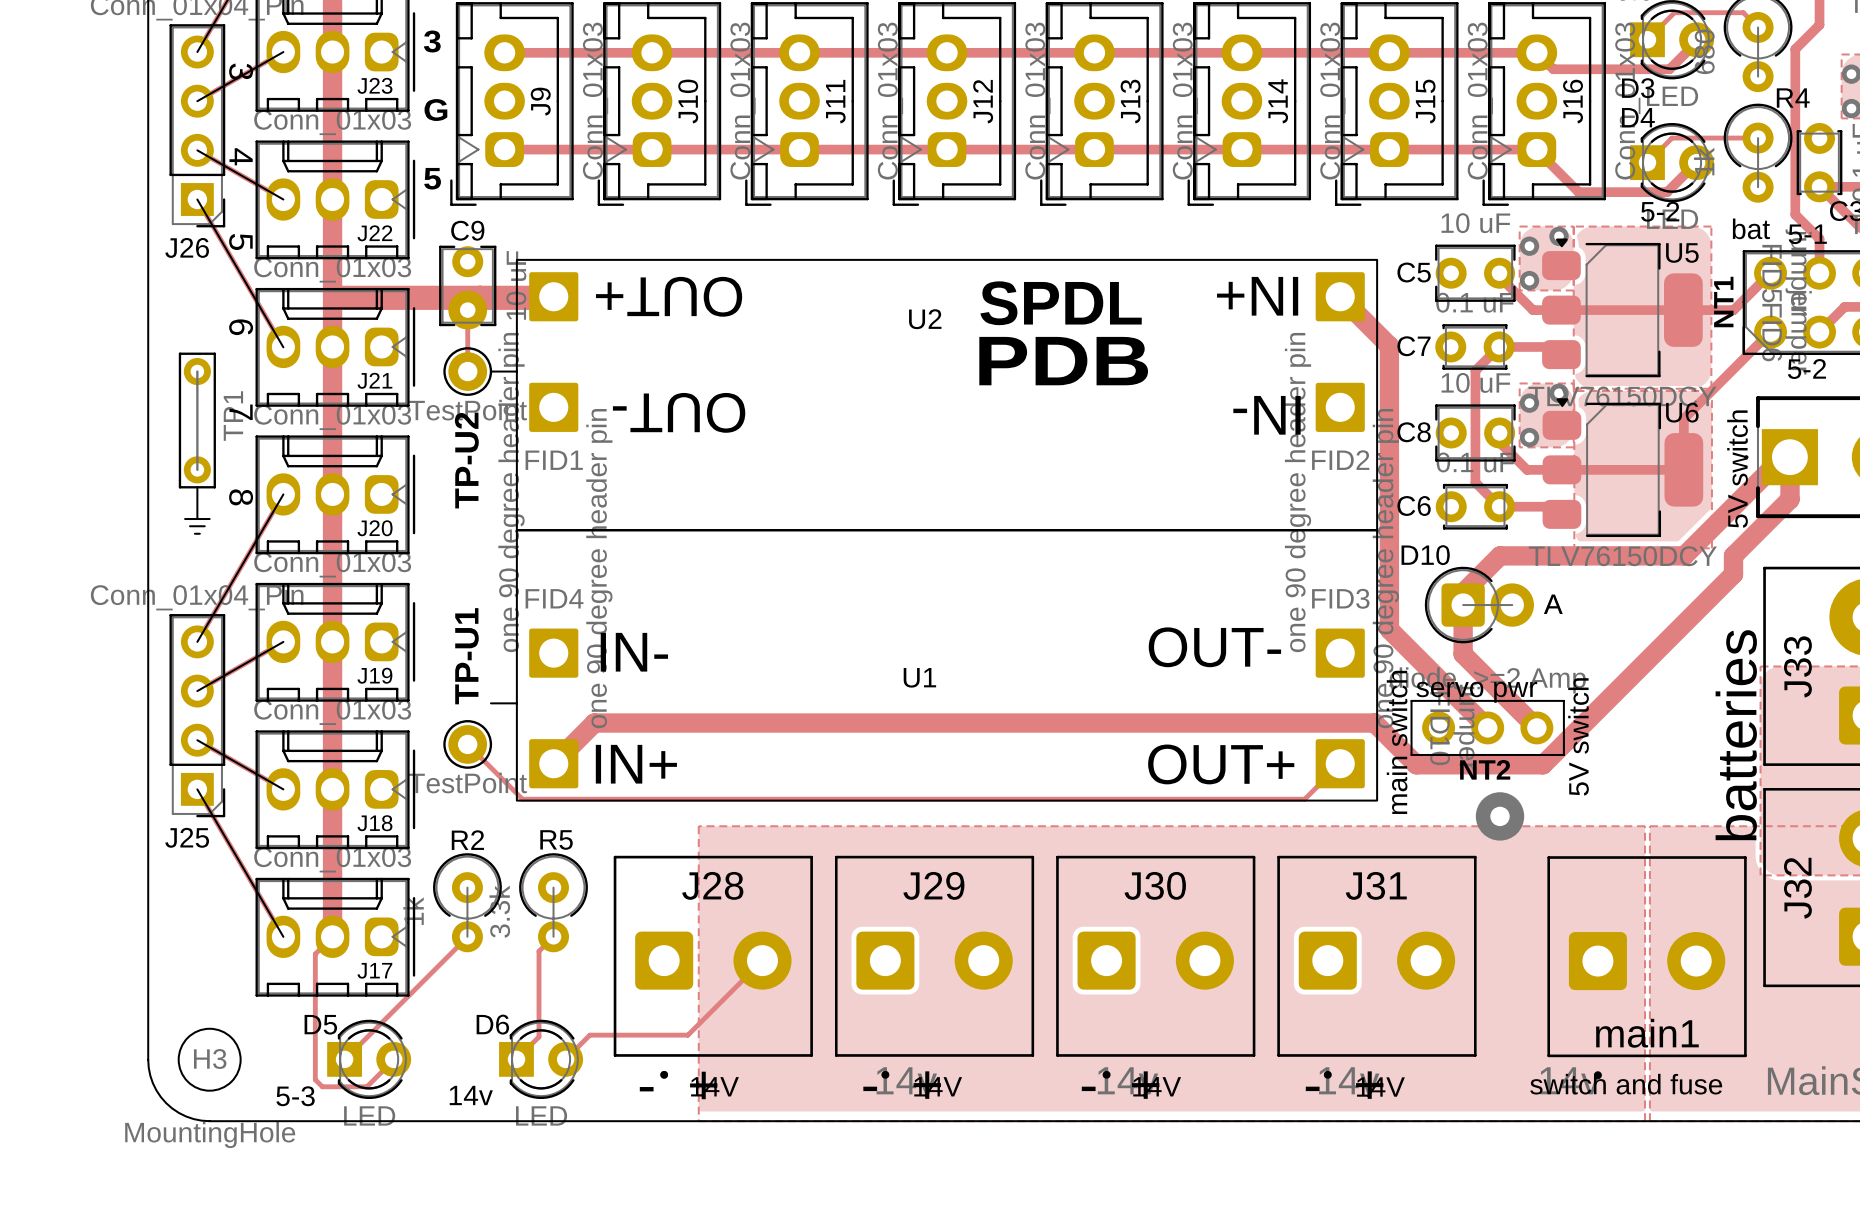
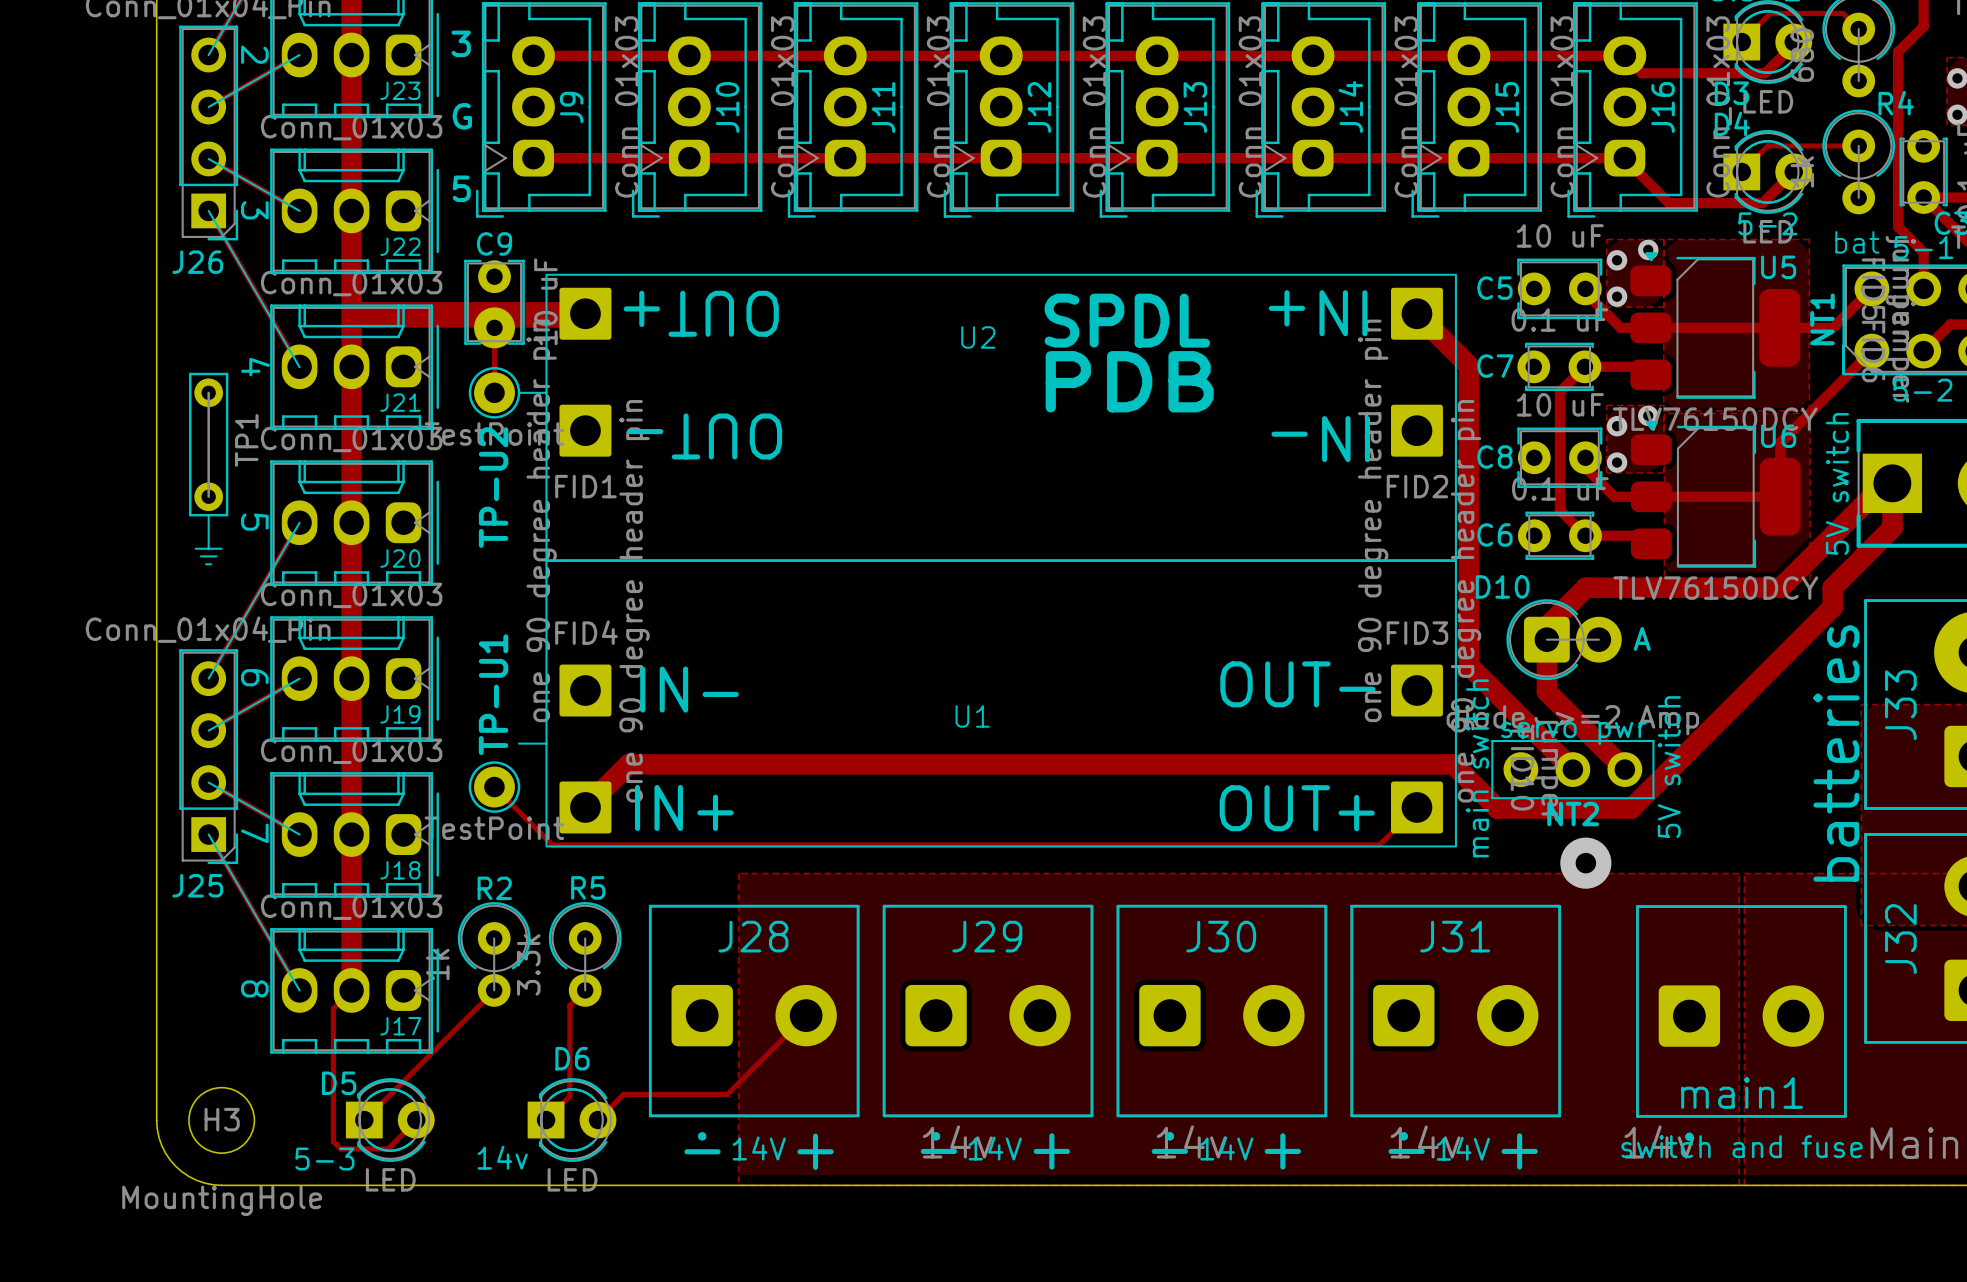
D6 name position: D6 (492, 1024) -> D6 (572, 1058)

